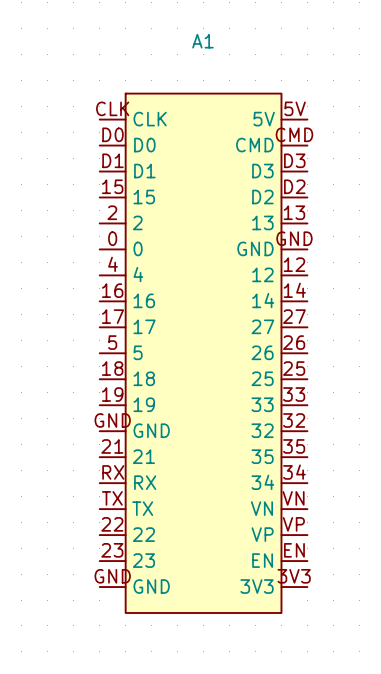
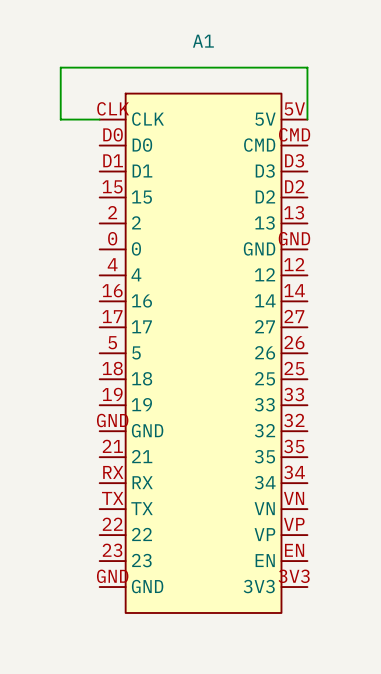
wire: none -> (99, 119) (60, 119) (60, 67) (307, 67) (307, 119)

